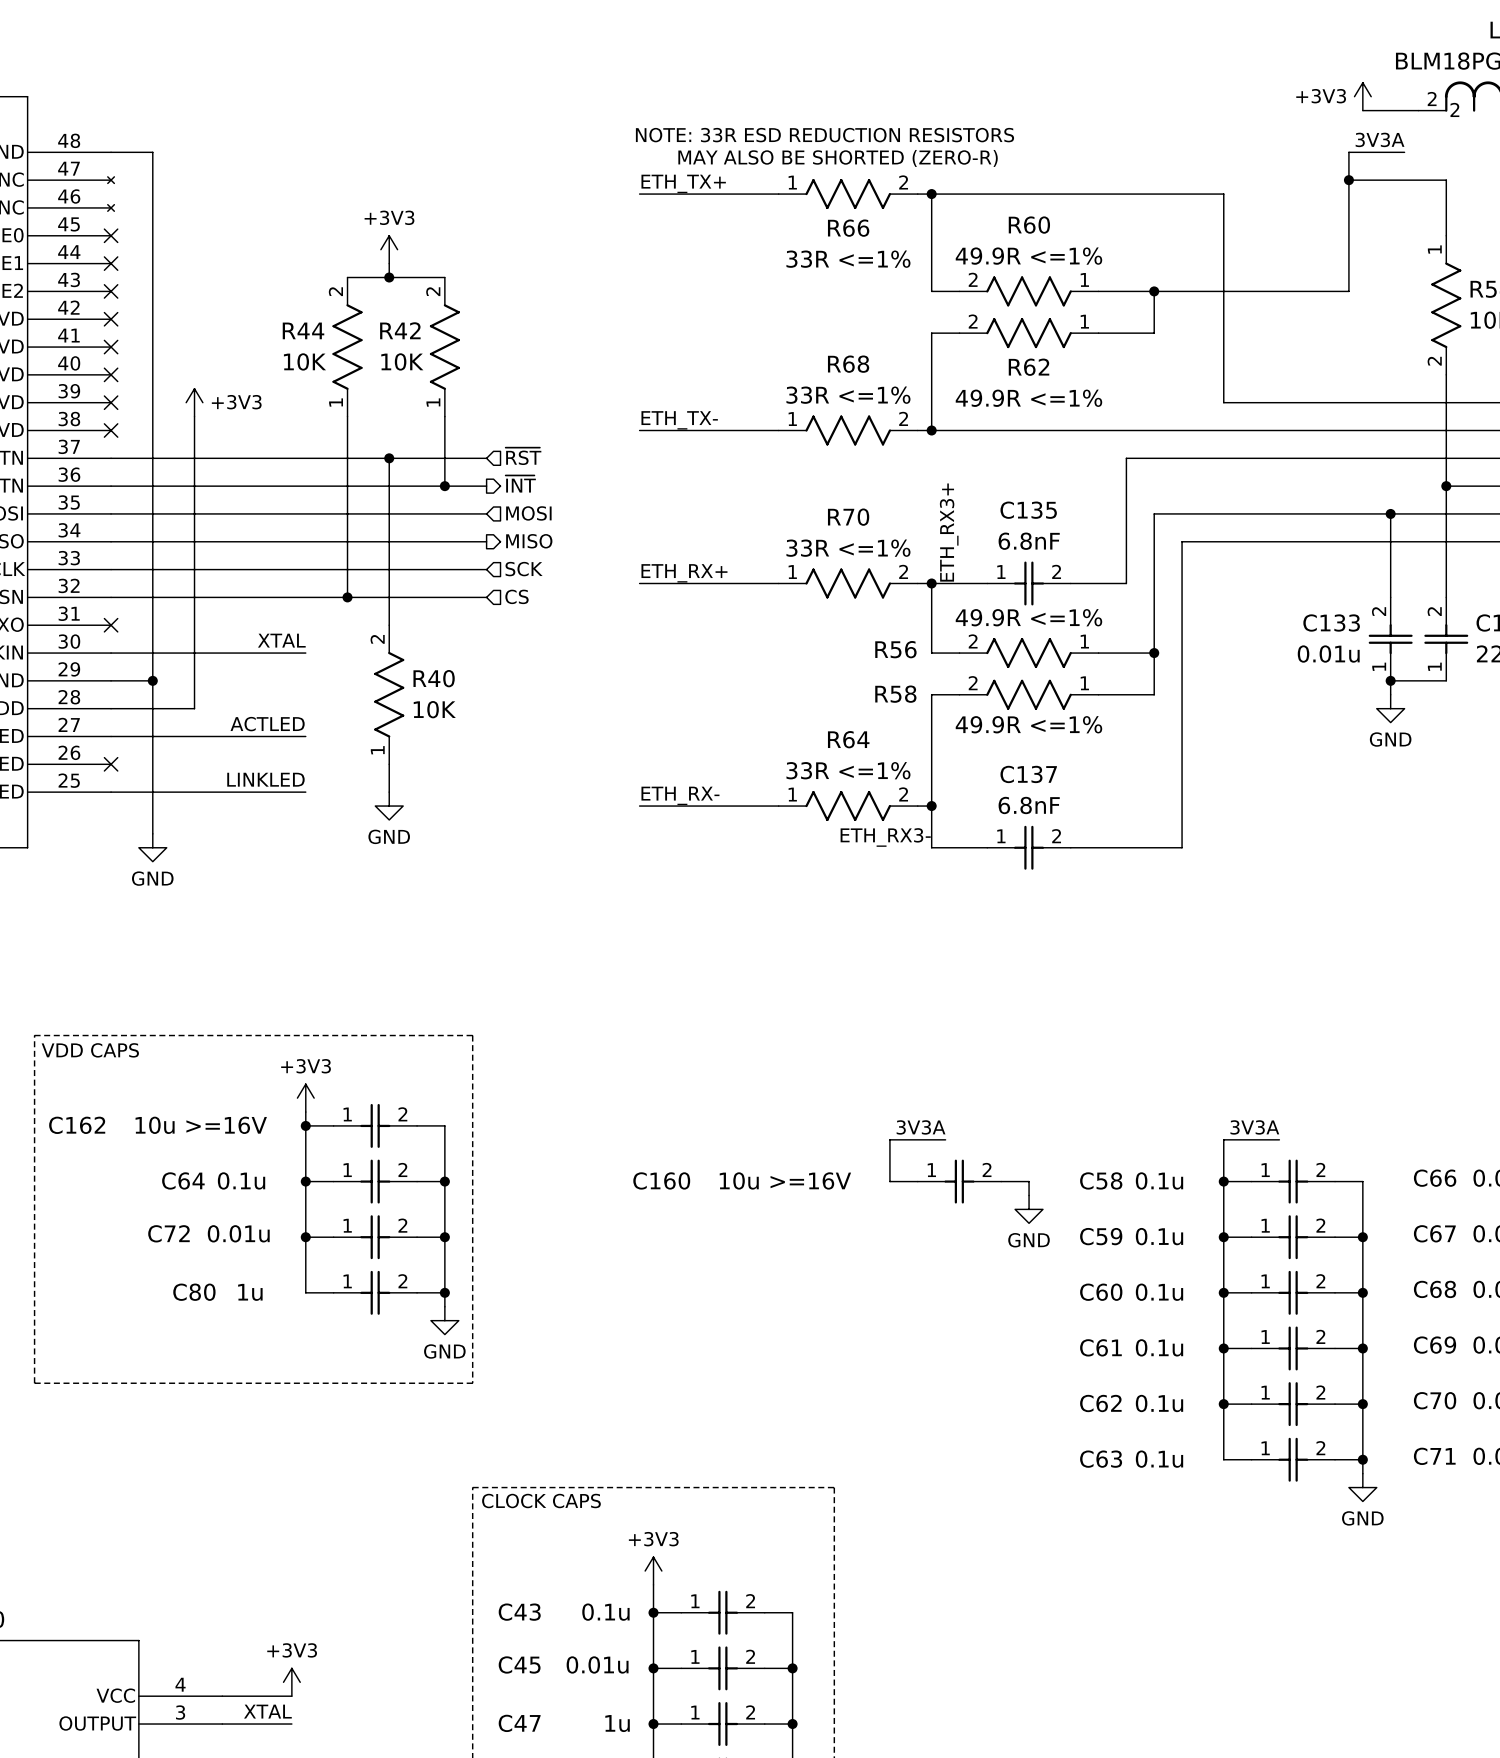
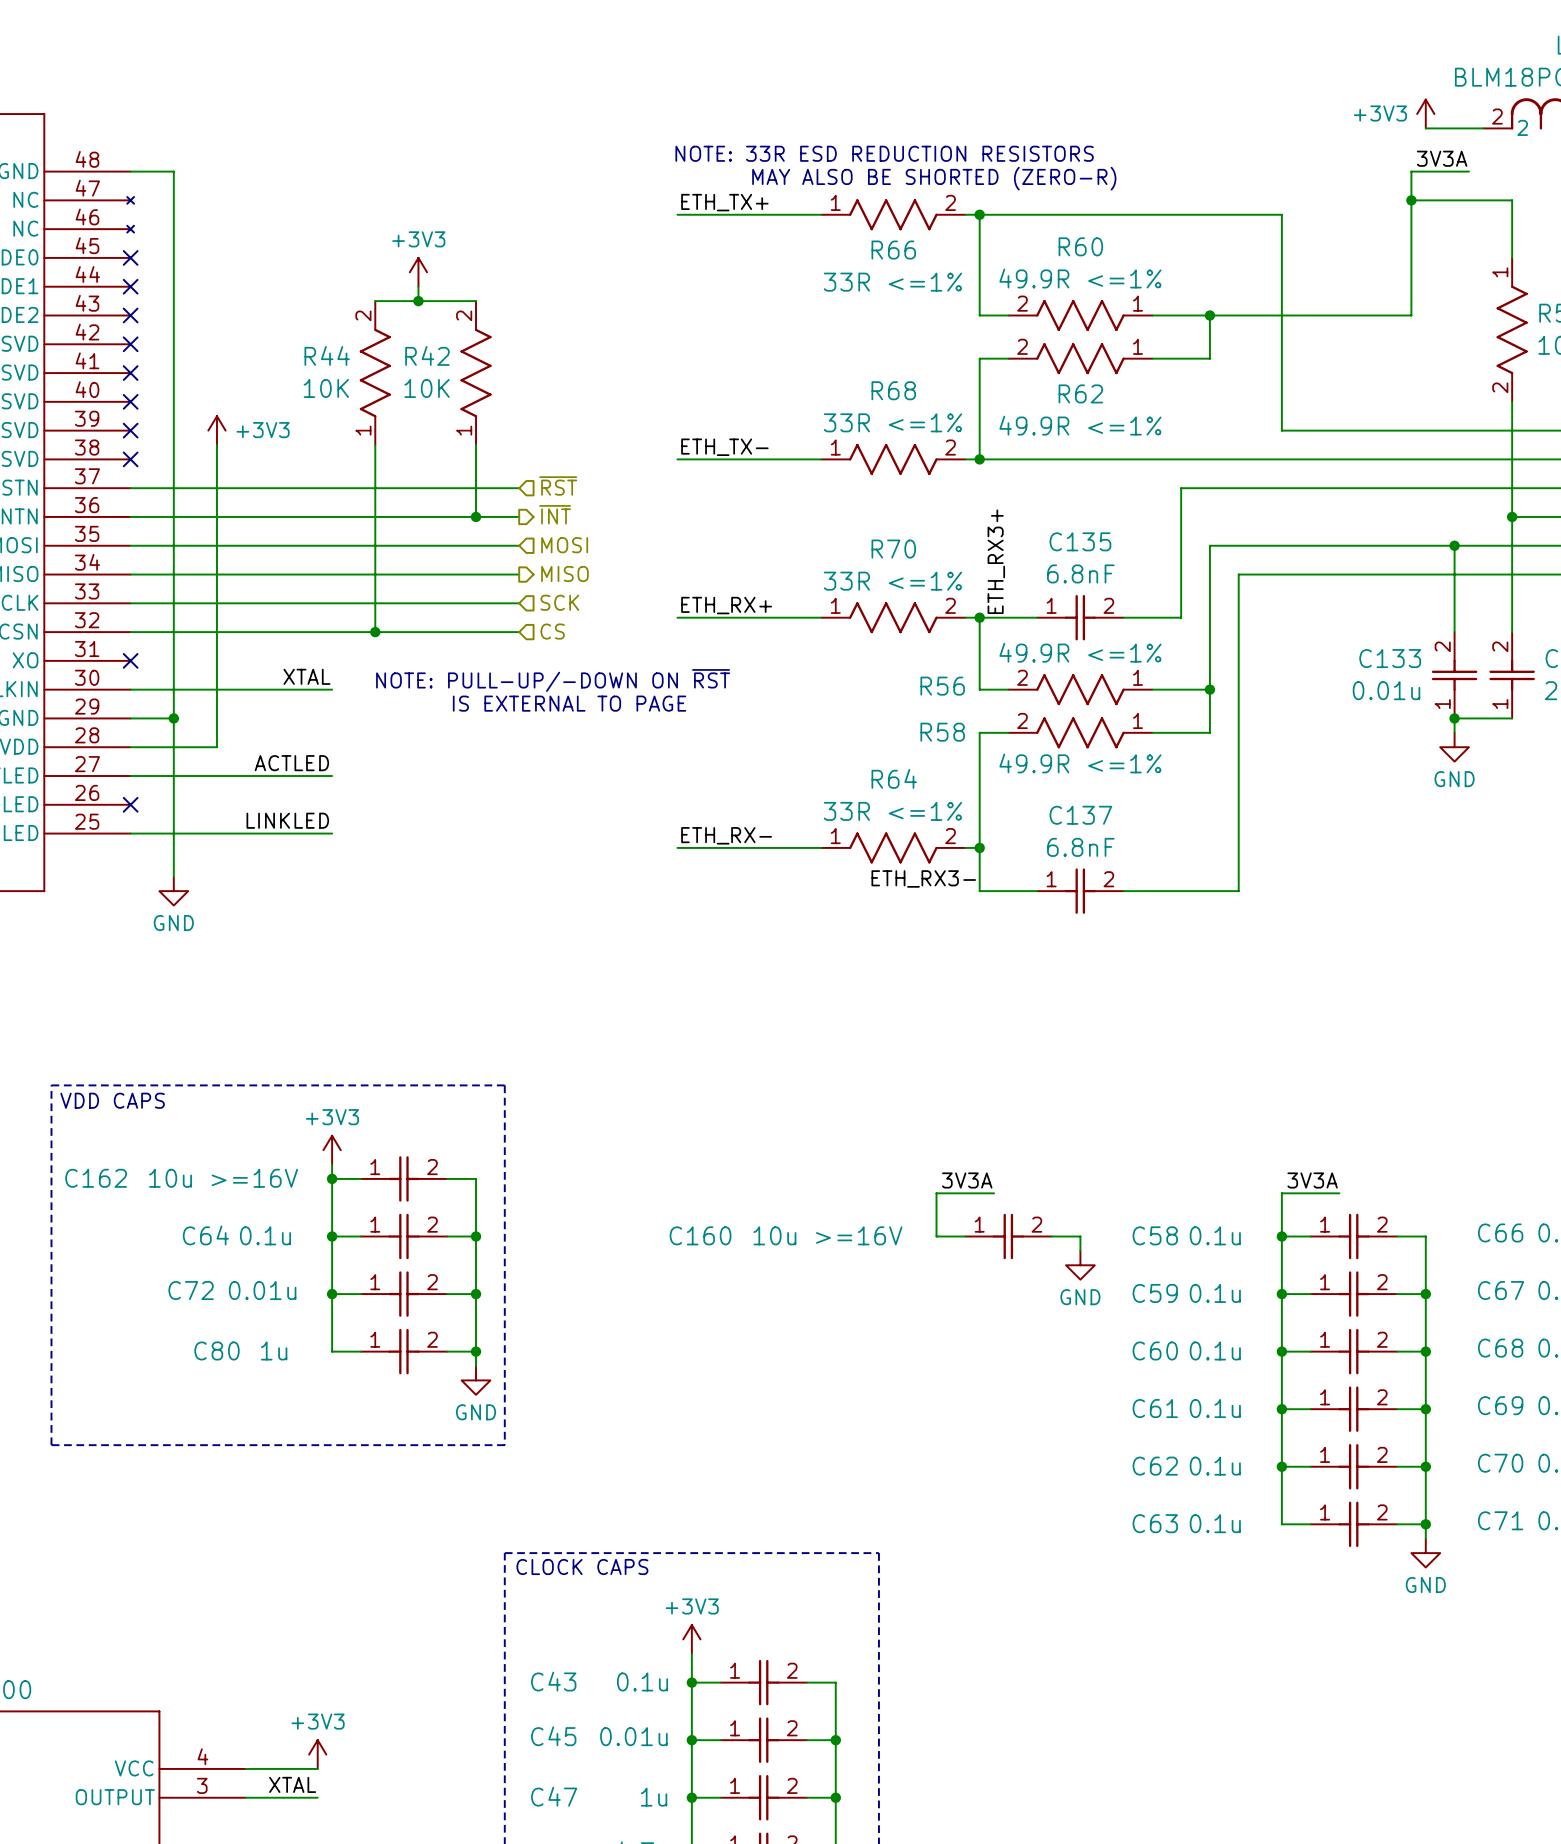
wire: (389, 458) (389, 625) -> none
junction: (389, 458) -> none
text: none -> NOTE: PULL-UP/-DOWN ON ~{RST} (553, 680)
text: none -> IS EXTERNAL TO PAGE (569, 703)
R40: 10K (389, 694) -> none
wire: (389, 764) (389, 792) -> none
power symbol: GND (389, 806) -> none

